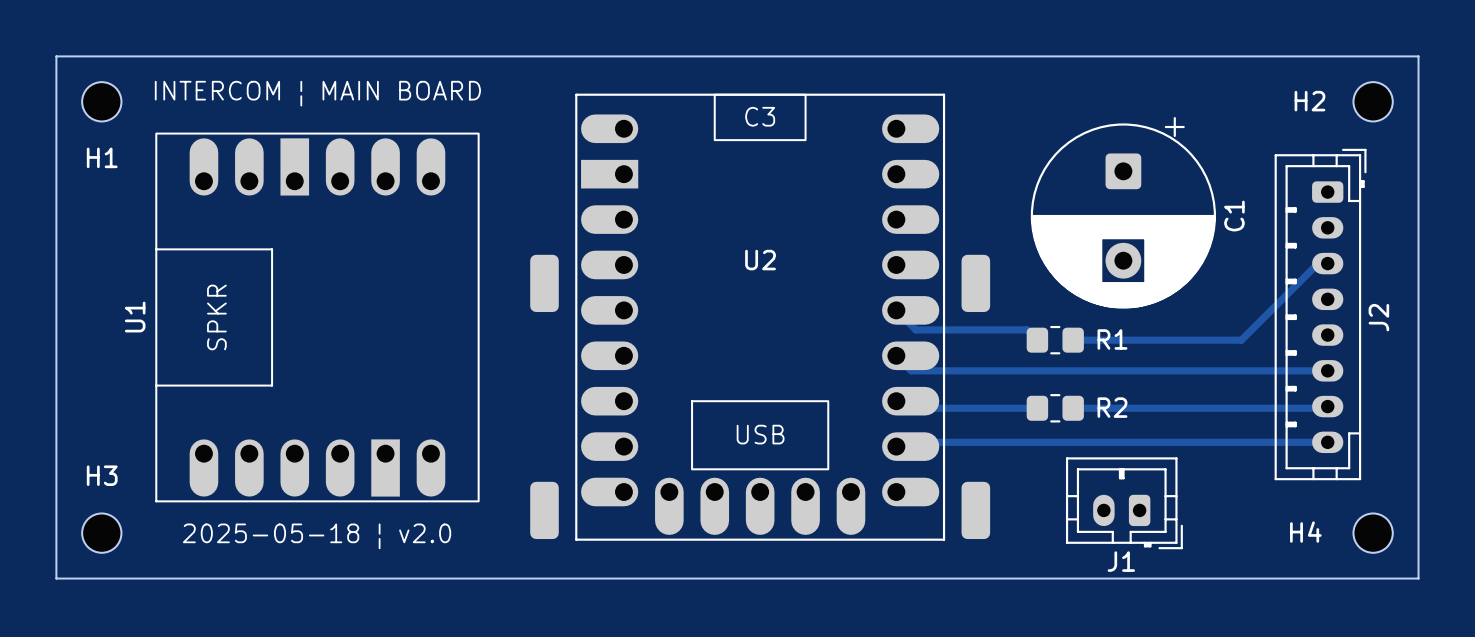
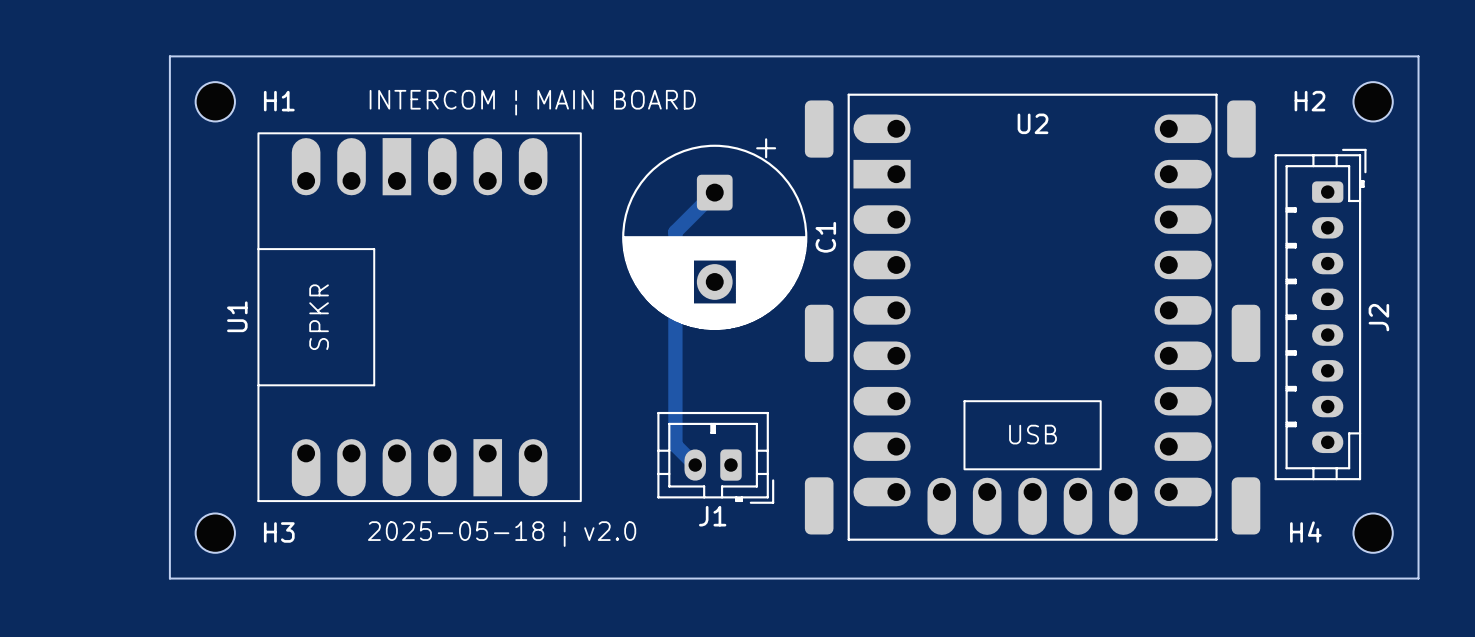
board edge: (169, 56) (56, 56) (56, 578) (169, 578) -> (169, 56) (169, 578)
text position: INTERCOM ¦ MAIN BOARD (317, 93) -> INTERCOM ¦ MAIN BOARD (532, 102)
U2 footprint: [575, 93, 946, 541] -> [847, 93, 1218, 541]
H1 position: (101, 101) -> (215, 101)
part: none -> (819, 129)
part: none -> (1241, 129)
H1 name position: H1 (102, 157) -> H1 (279, 101)
track: none -> (714, 192) (675, 231) (675, 445) (695, 465)
C1 position: (1123, 212) -> (714, 234)
U2 name position: U2 (760, 260) -> U2 (1033, 123)
track: (1327, 263) (1318, 263) (1241, 340) (1073, 340) -> none
part: (544, 283) -> none
part: (975, 283) -> none
track: (896, 310) (915, 329) (1027, 329) (1037, 340) -> none
U1 position: (317, 317) -> (419, 317)
part: none -> (819, 333)
part: none -> (1245, 333)
R1: (1055, 340) -> none
track: (896, 355) (911, 370) (1327, 370) -> none
track: (896, 401) (903, 408) (1037, 408) -> none
track: (1327, 406) (1326, 408) (1073, 408) -> none
R2: (1055, 408) -> none
track: (1327, 442) (900, 442) (896, 446) -> none
H3 name position: H3 (102, 475) -> H3 (279, 532)
J1 position: (1124, 503) -> (715, 457)
part: none -> (819, 505)
part: none -> (1245, 505)
part: (544, 510) -> none
part: (975, 510) -> none
H3 position: (101, 533) -> (215, 533)
text position: 2025-05-18 ¦ v2.0 (317, 536) -> 2025-05-18 ¦ v2.0 (502, 534)

